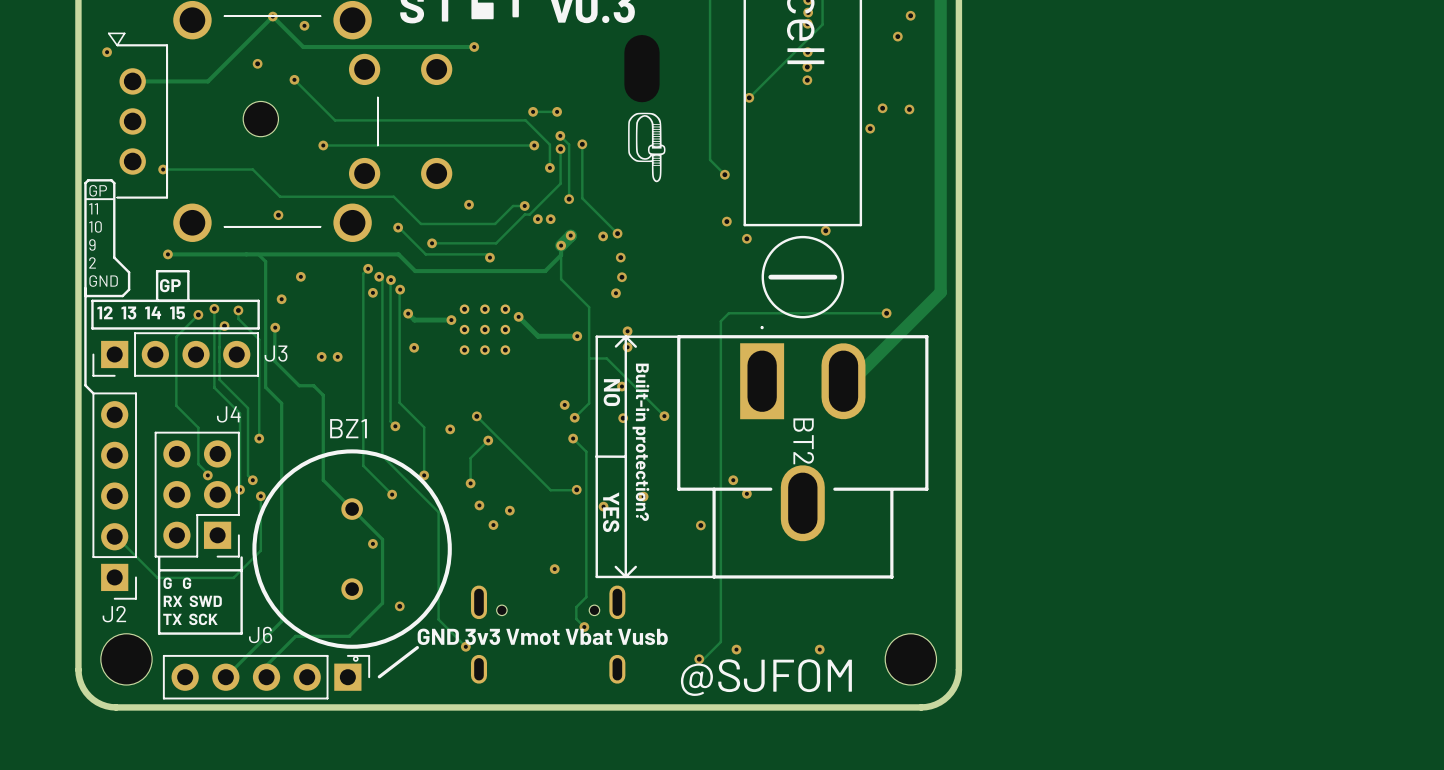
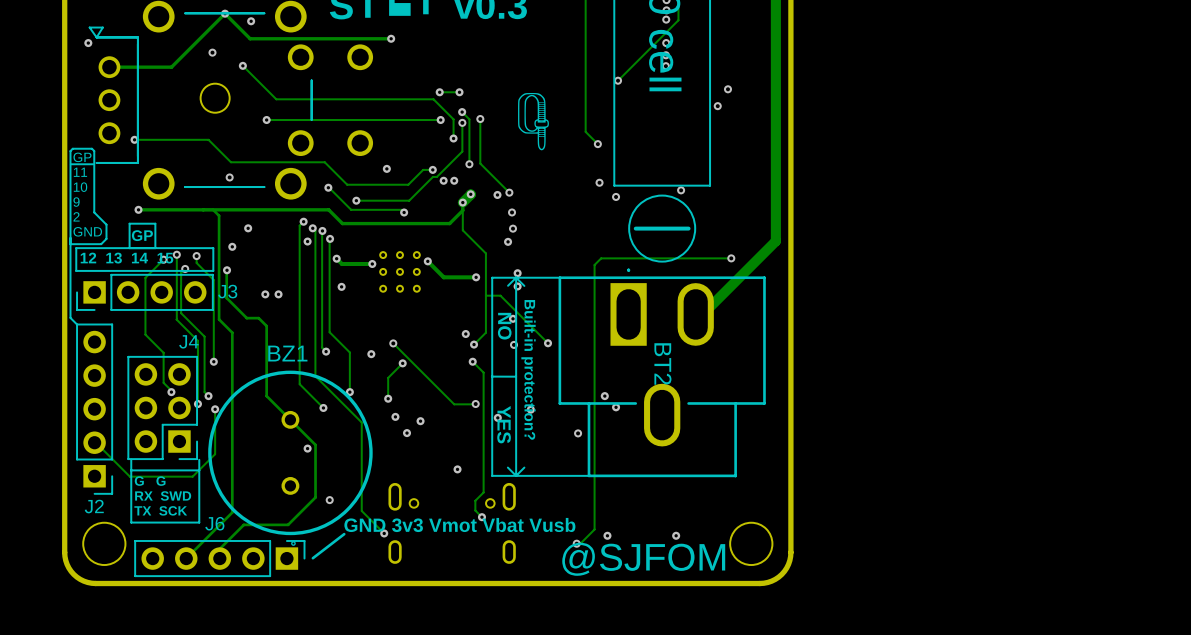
via: (910, 15) -> none
via: (897, 36) -> none
via: (909, 109) -> none

